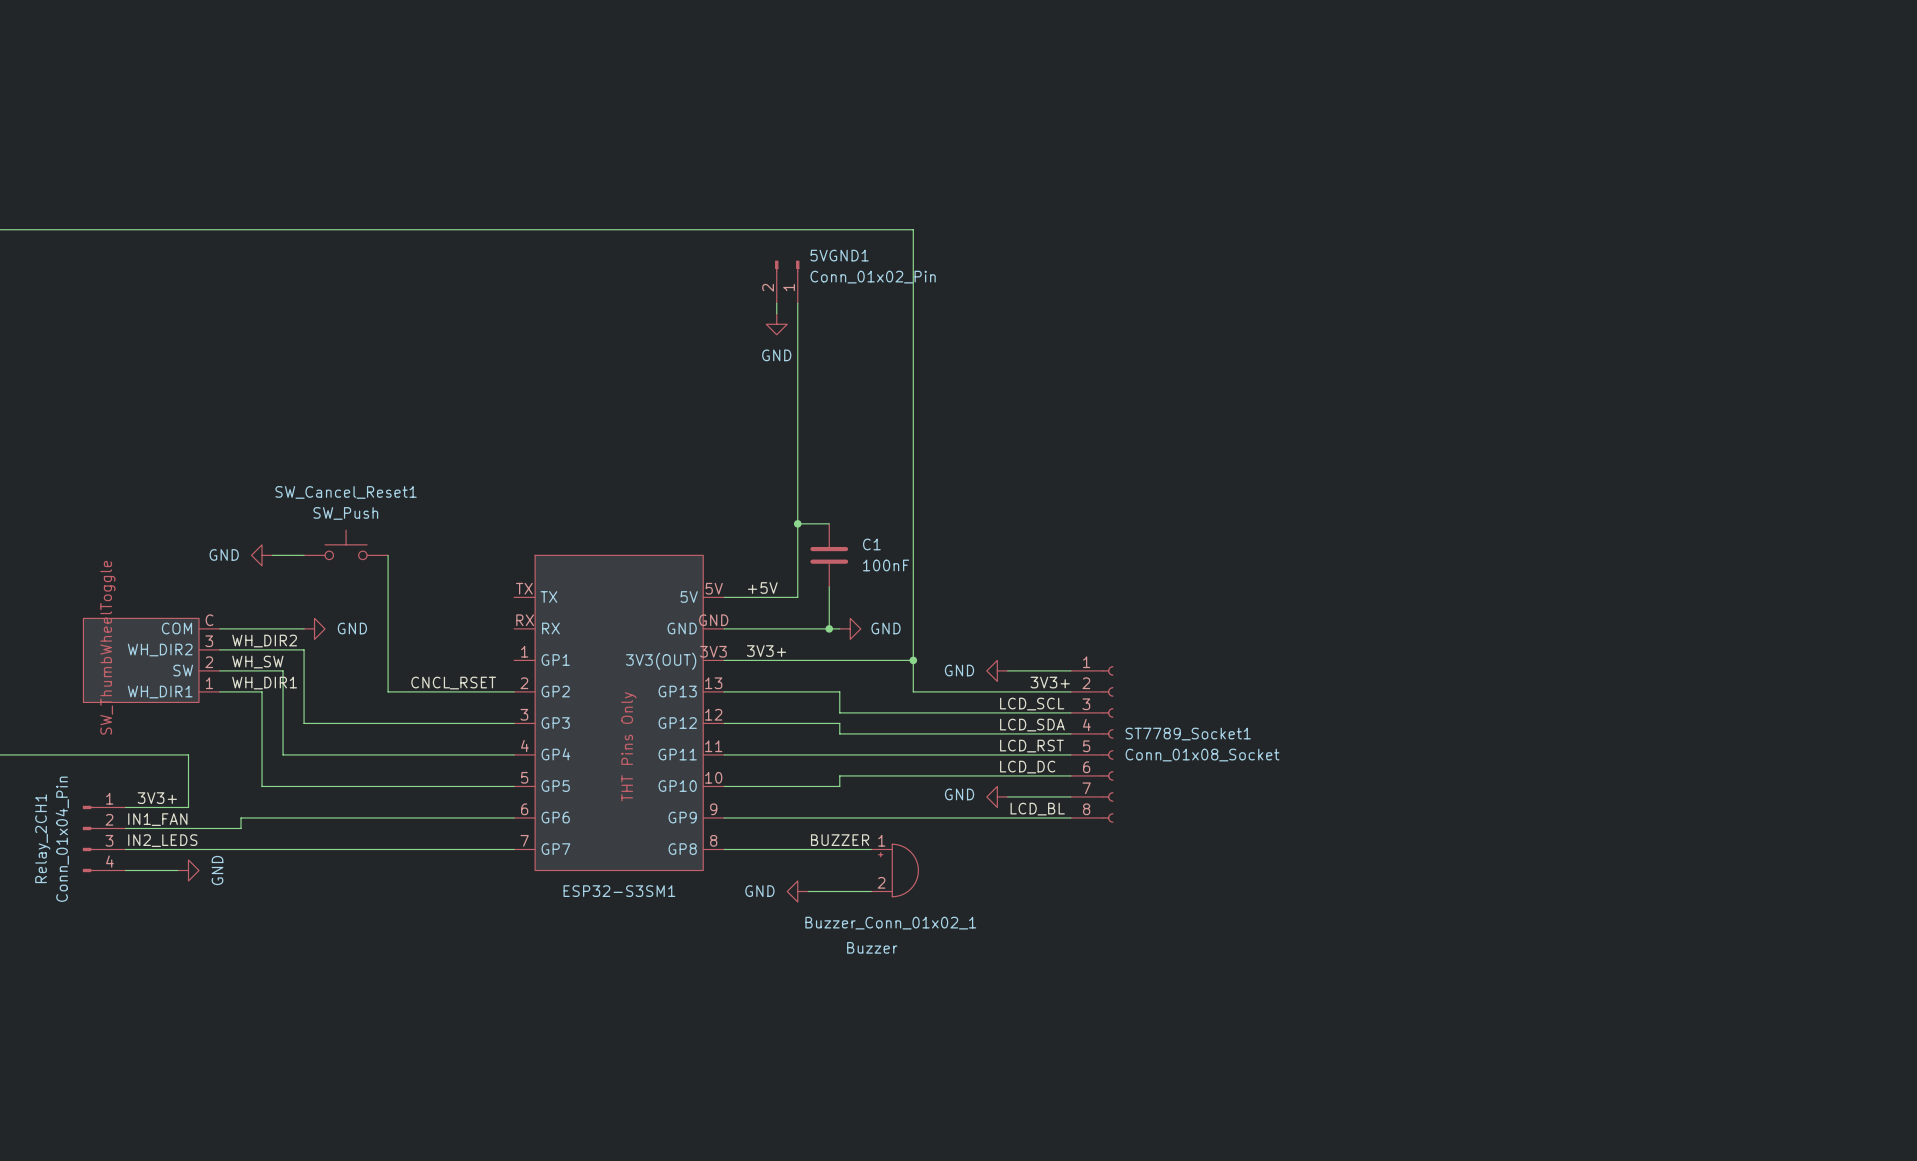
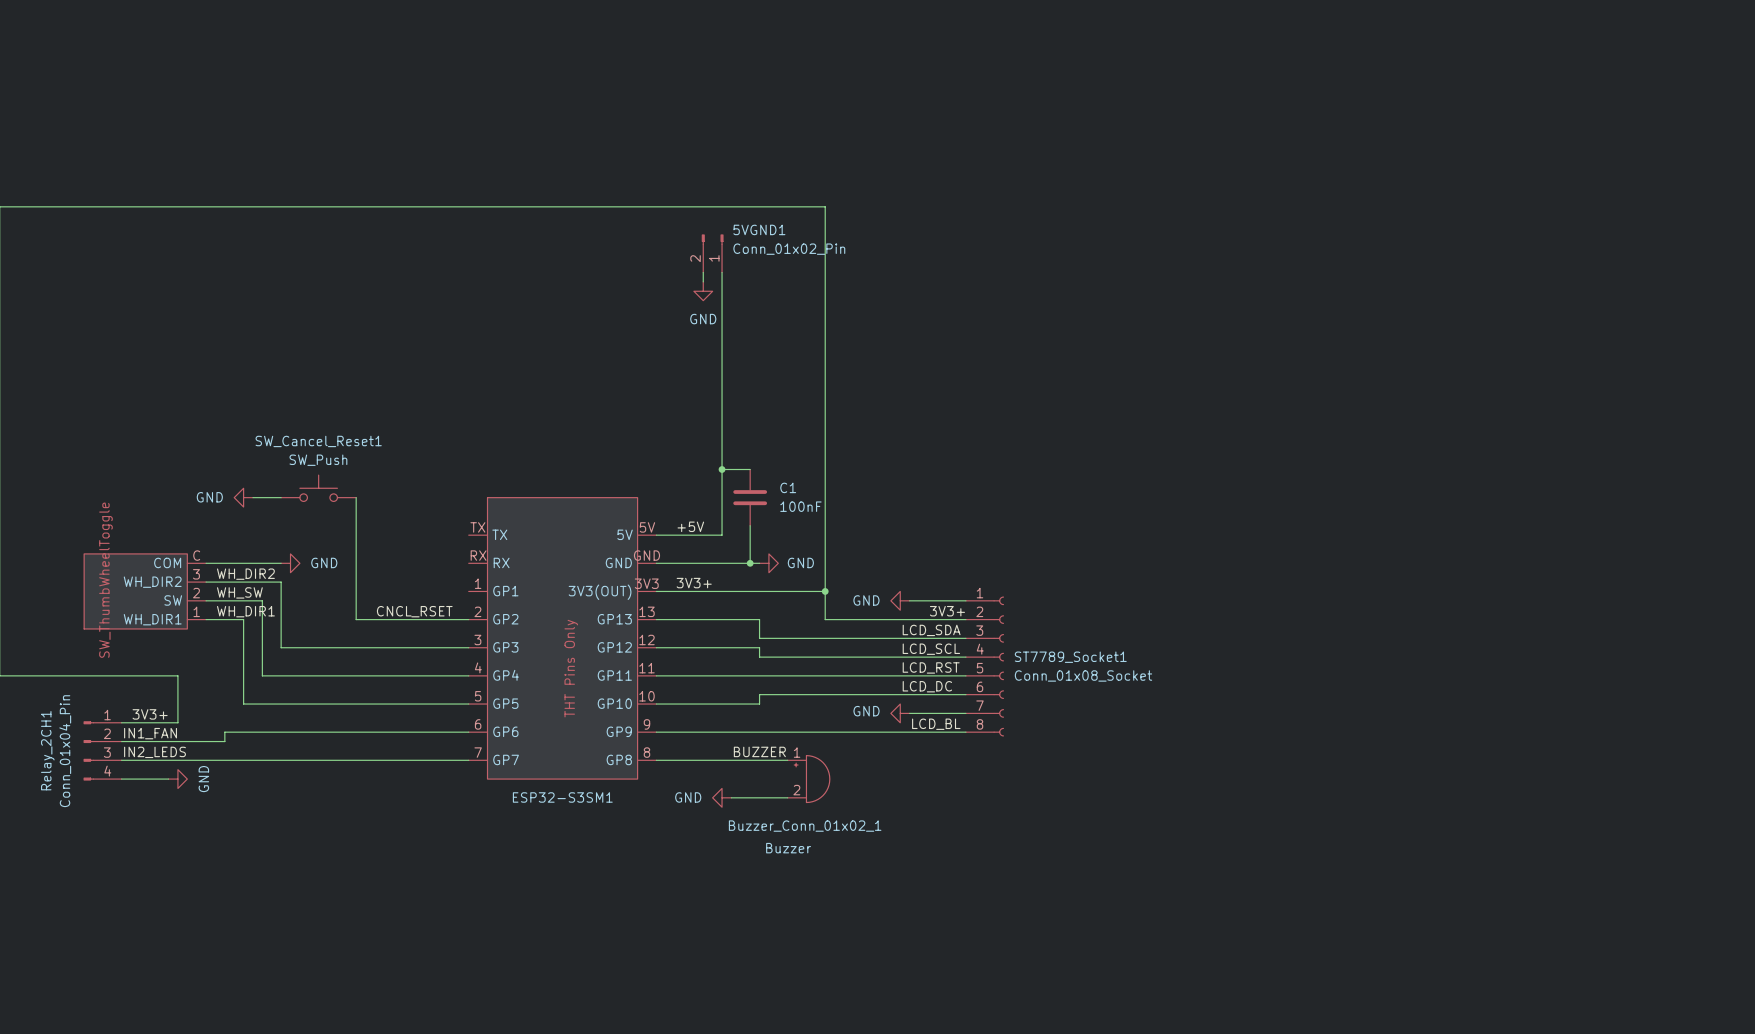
label: LCD_SCL (1032, 704) -> LCD_SDA (931, 630)
label: LCD_SDA (1032, 725) -> LCD_SCL (931, 649)

